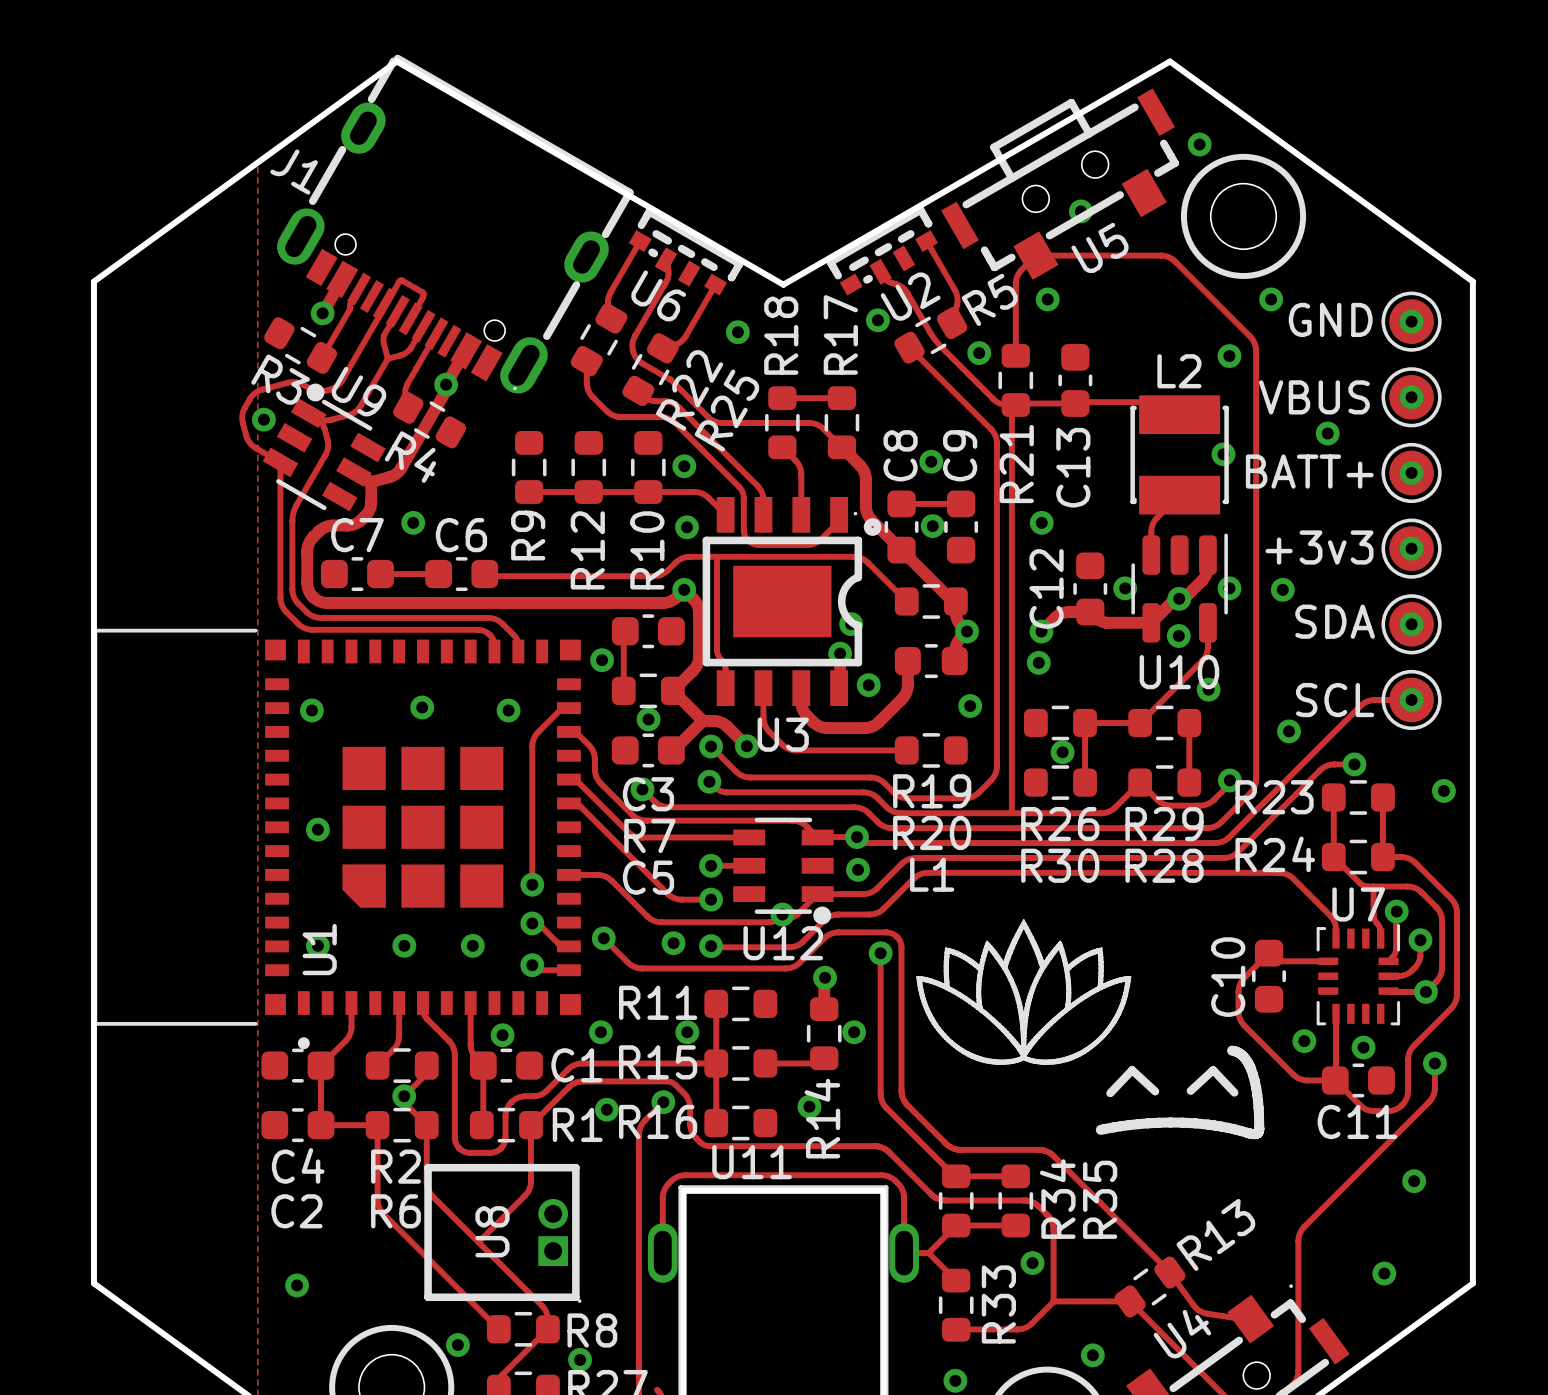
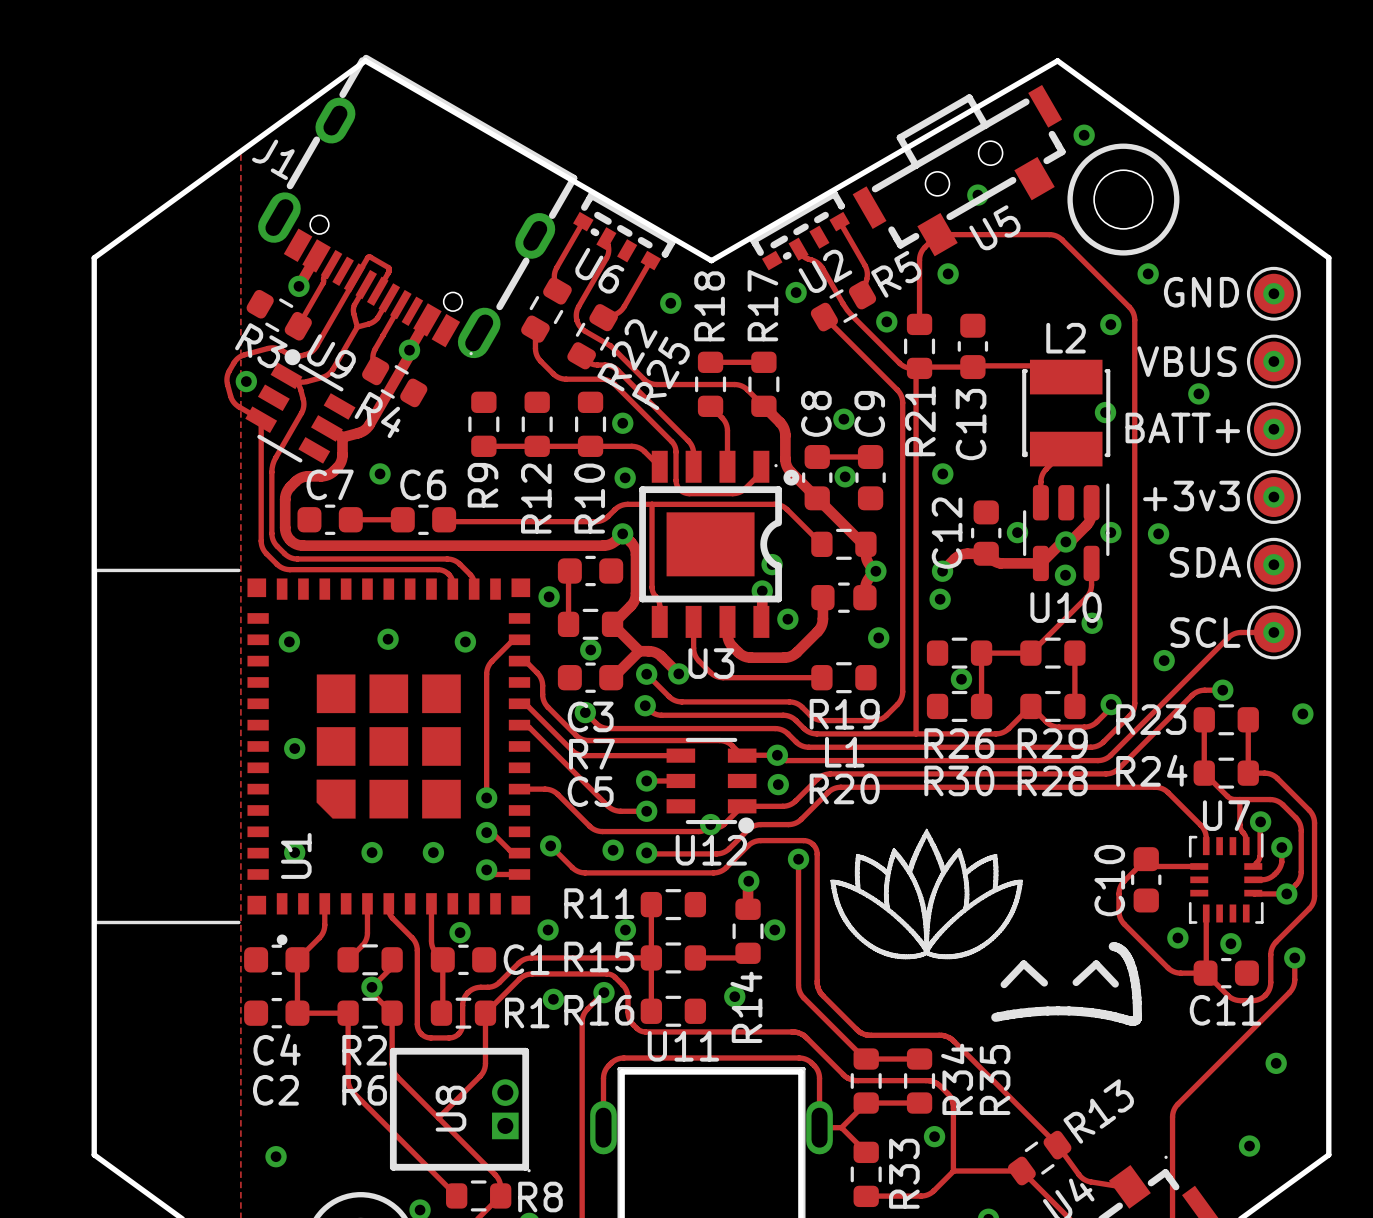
R20 name position: R20 (932, 832) -> R20 (844, 788)
L1 name position: L1 (932, 874) -> L1 (844, 752)

